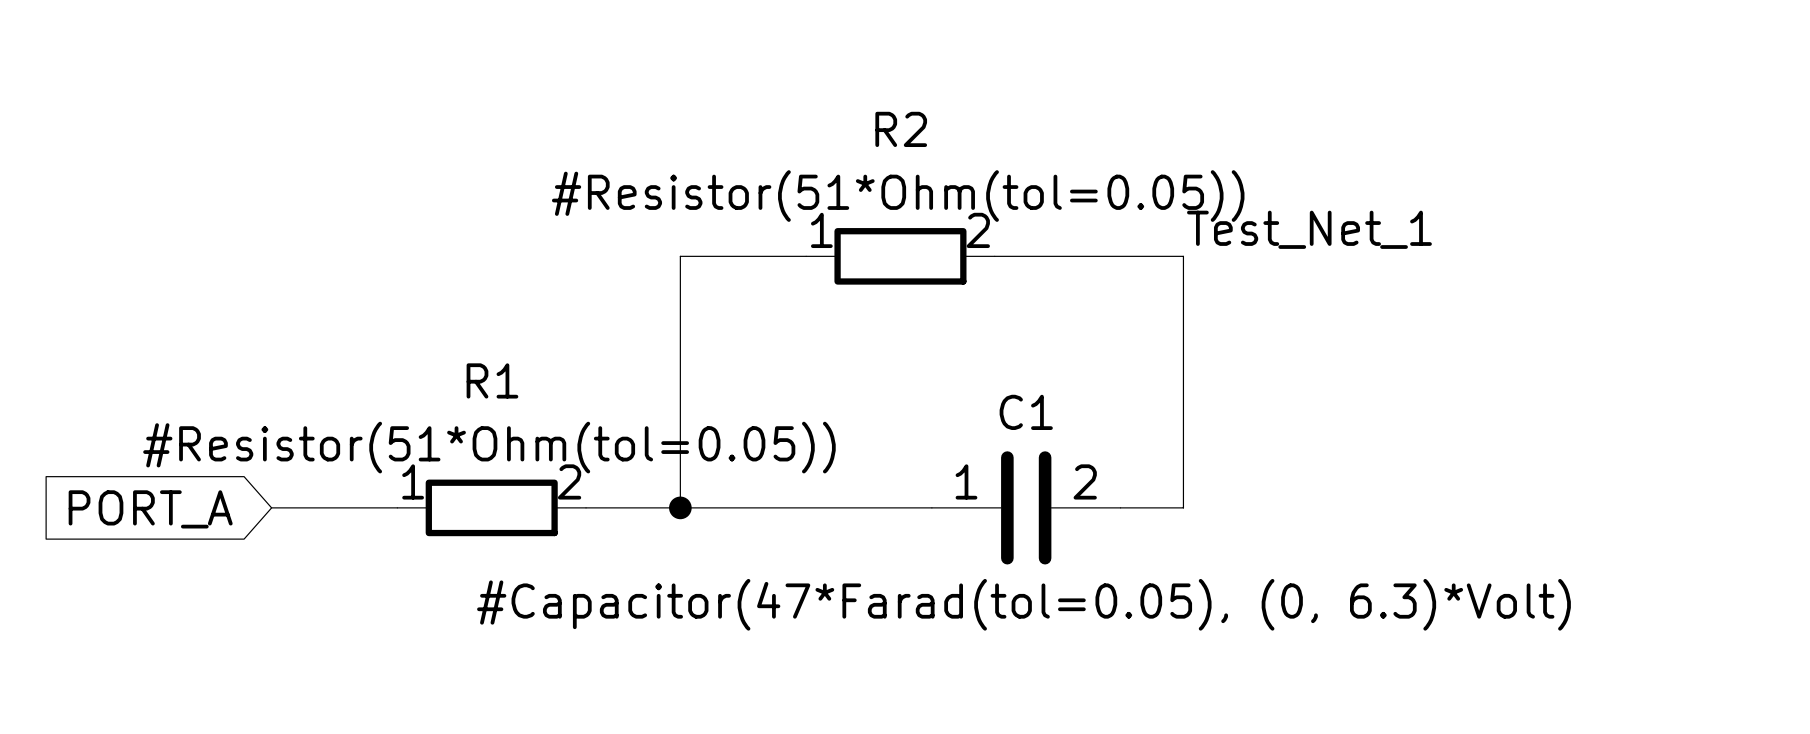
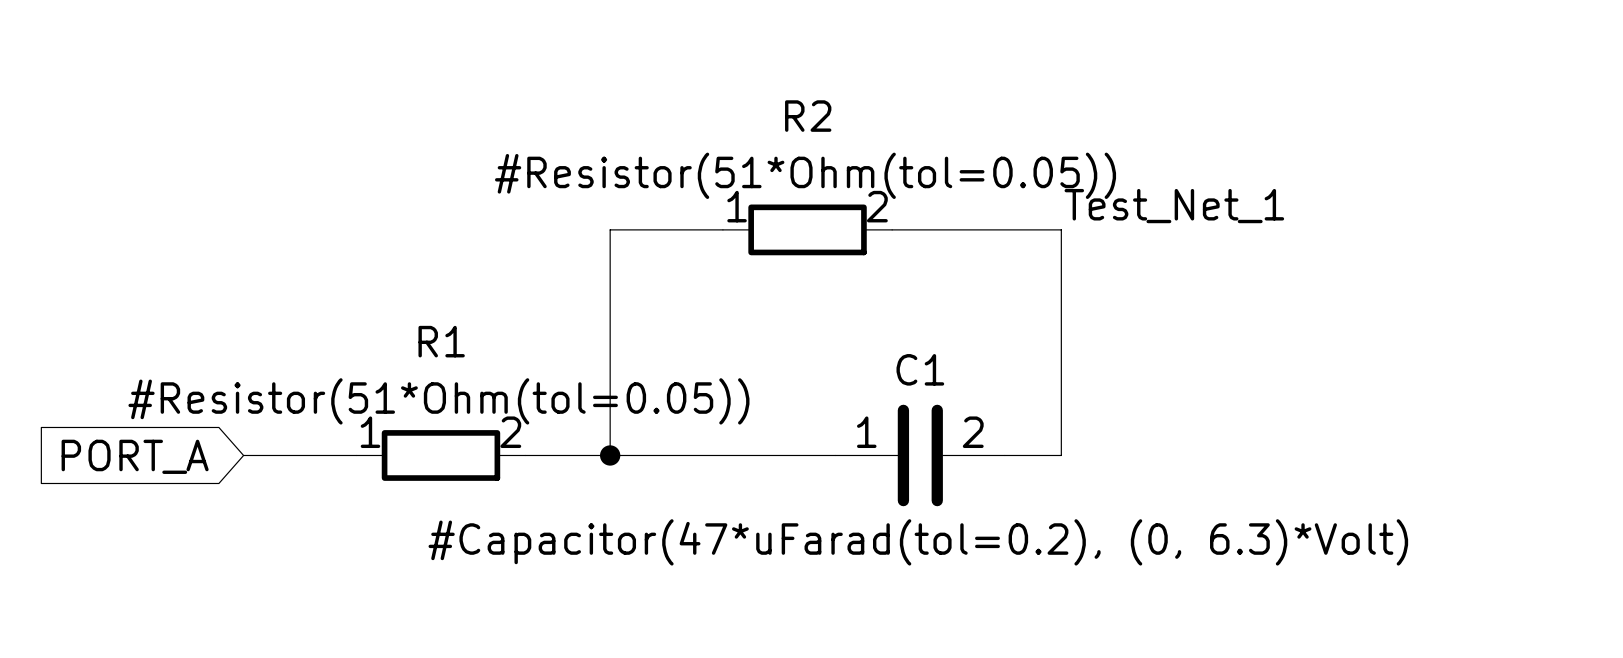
C1 value: #Capacitor(47*Farad(tol=0.05), (0, 6.3)*Volt) (1023, 604) -> #Capacitor(47*uFarad(tol=0.2), (0, 6.3)*Volt) (918, 542)

